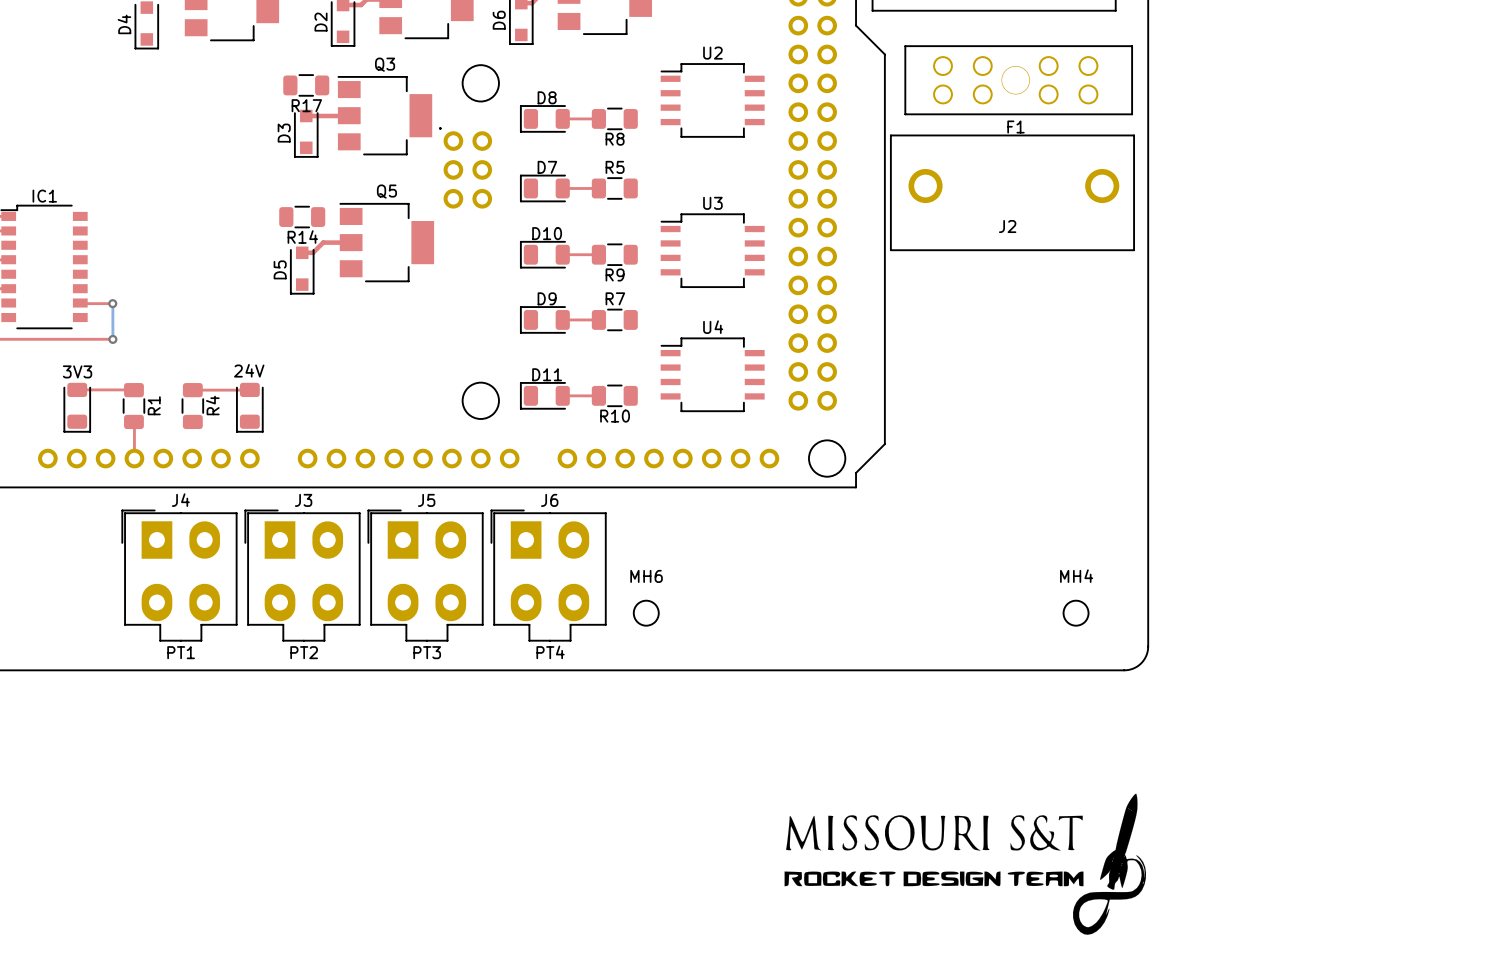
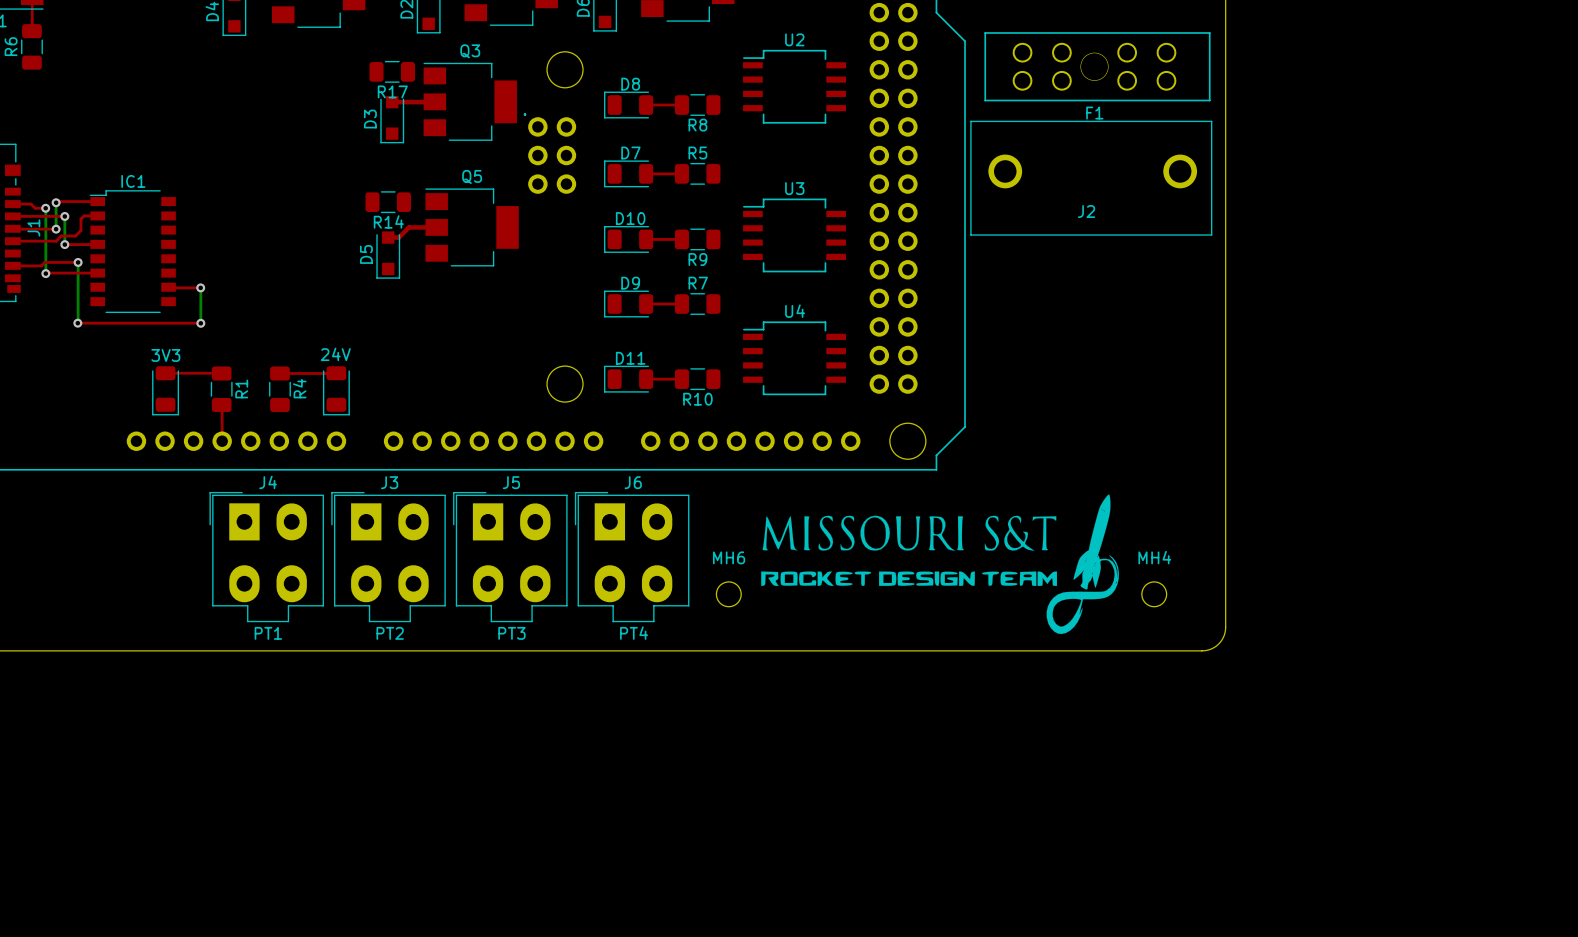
drawing: none -> [761, 494, 1119, 635]
drawing: [784, 793, 1147, 935] -> none

